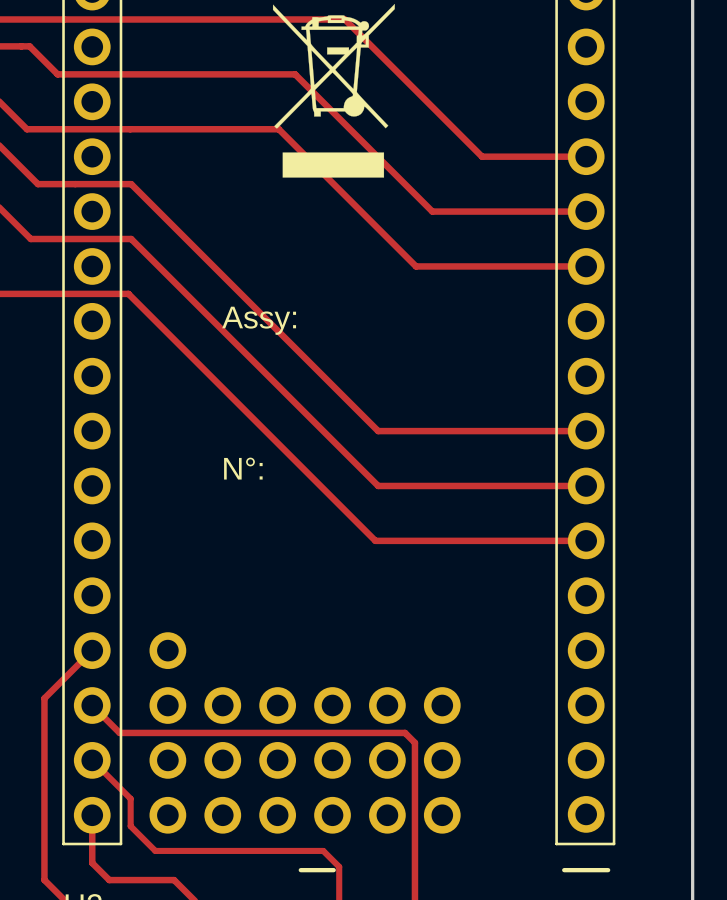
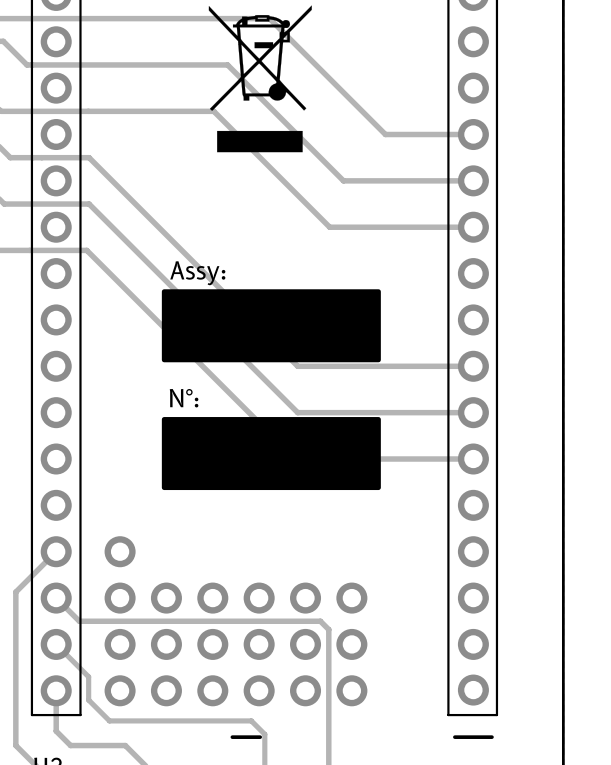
drawing: none -> [161, 289, 381, 363]
drawing: none -> [161, 417, 381, 491]

